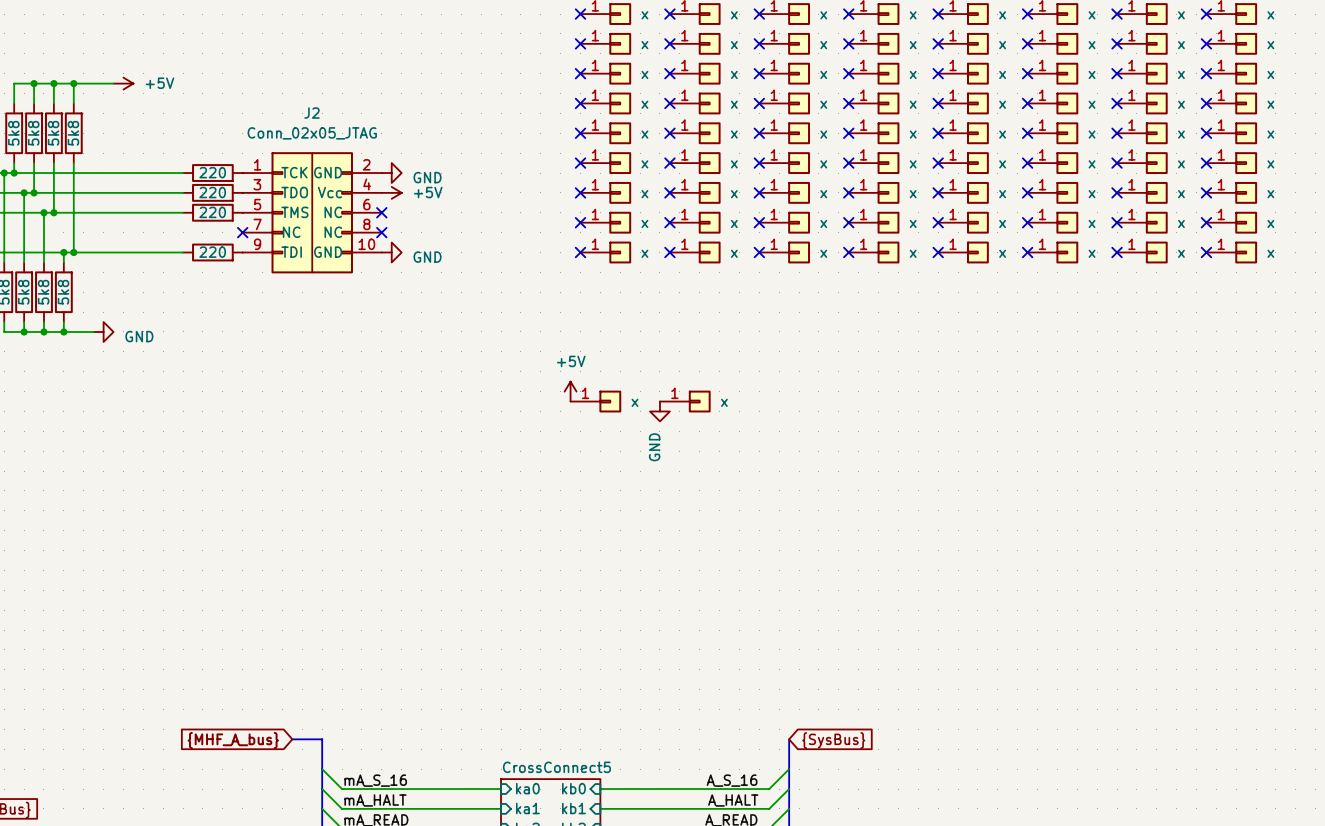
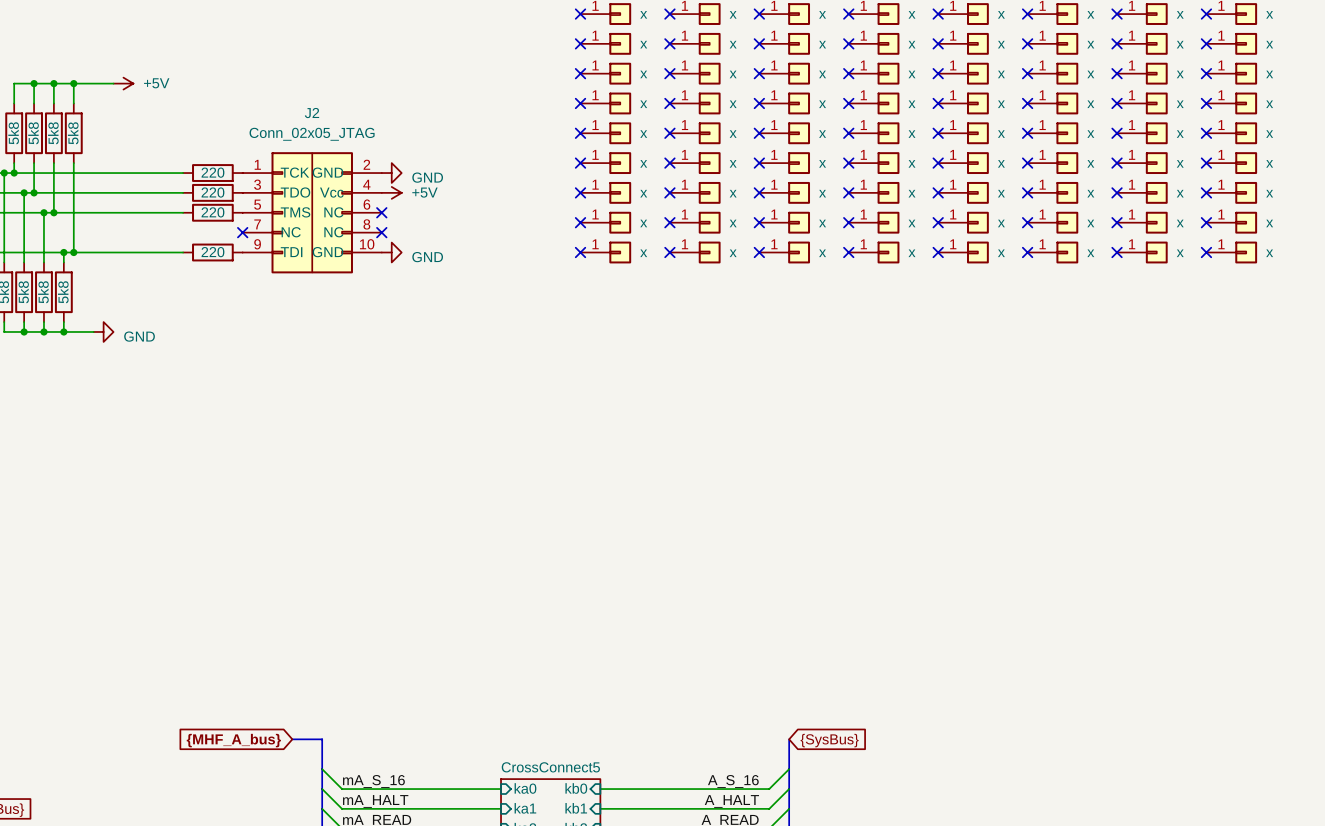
power symbol: +5V (570, 391) -> none
part: x (595, 401) -> none
part: x (685, 401) -> none
power symbol: GND (659, 411) -> none

